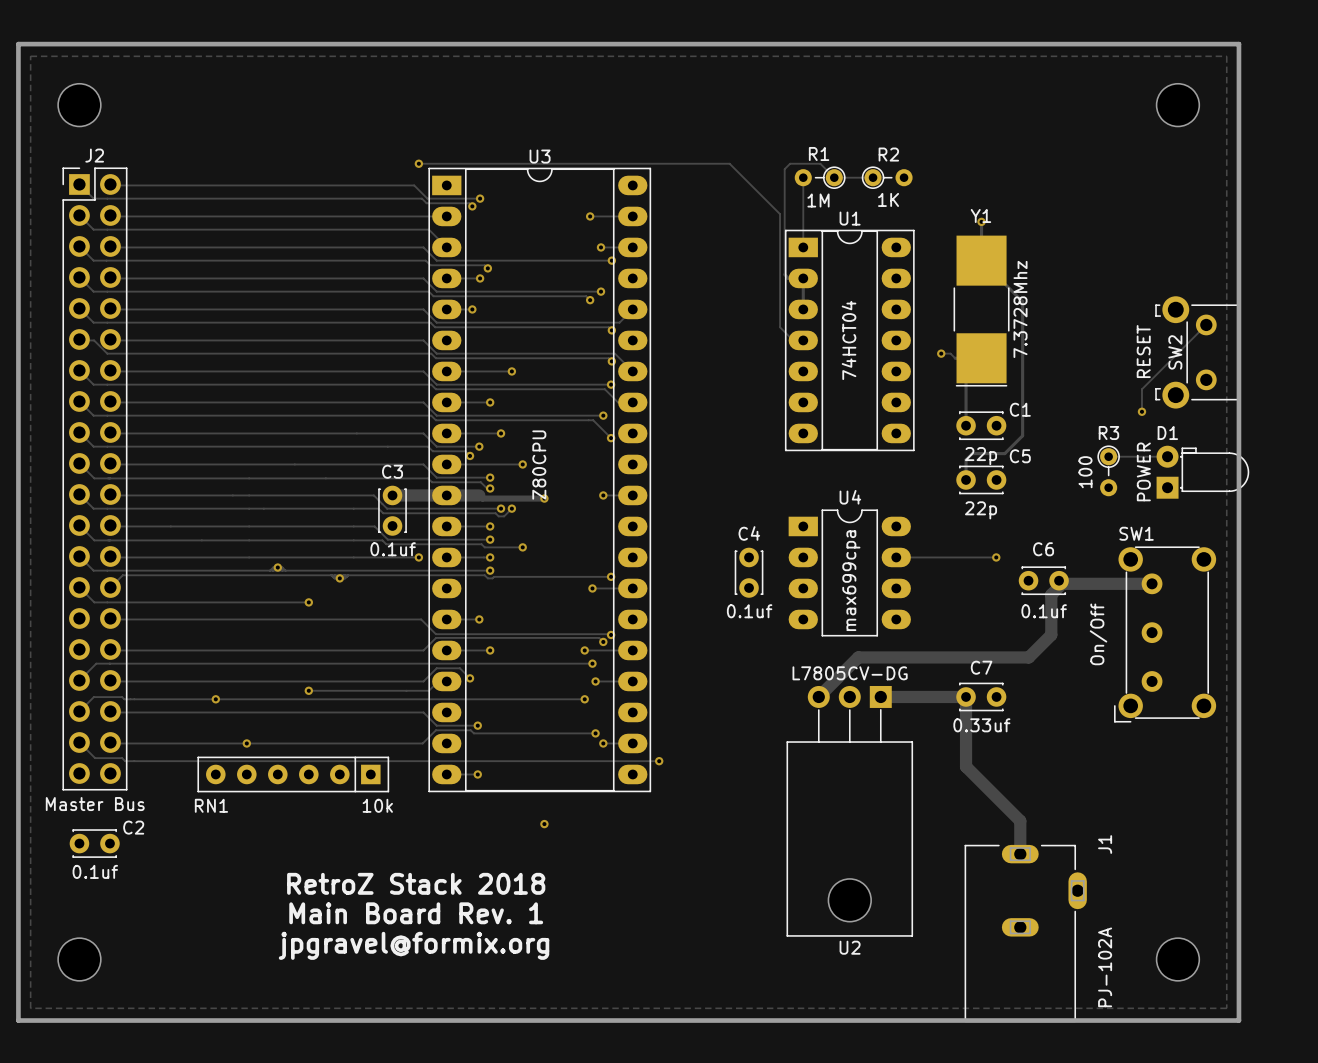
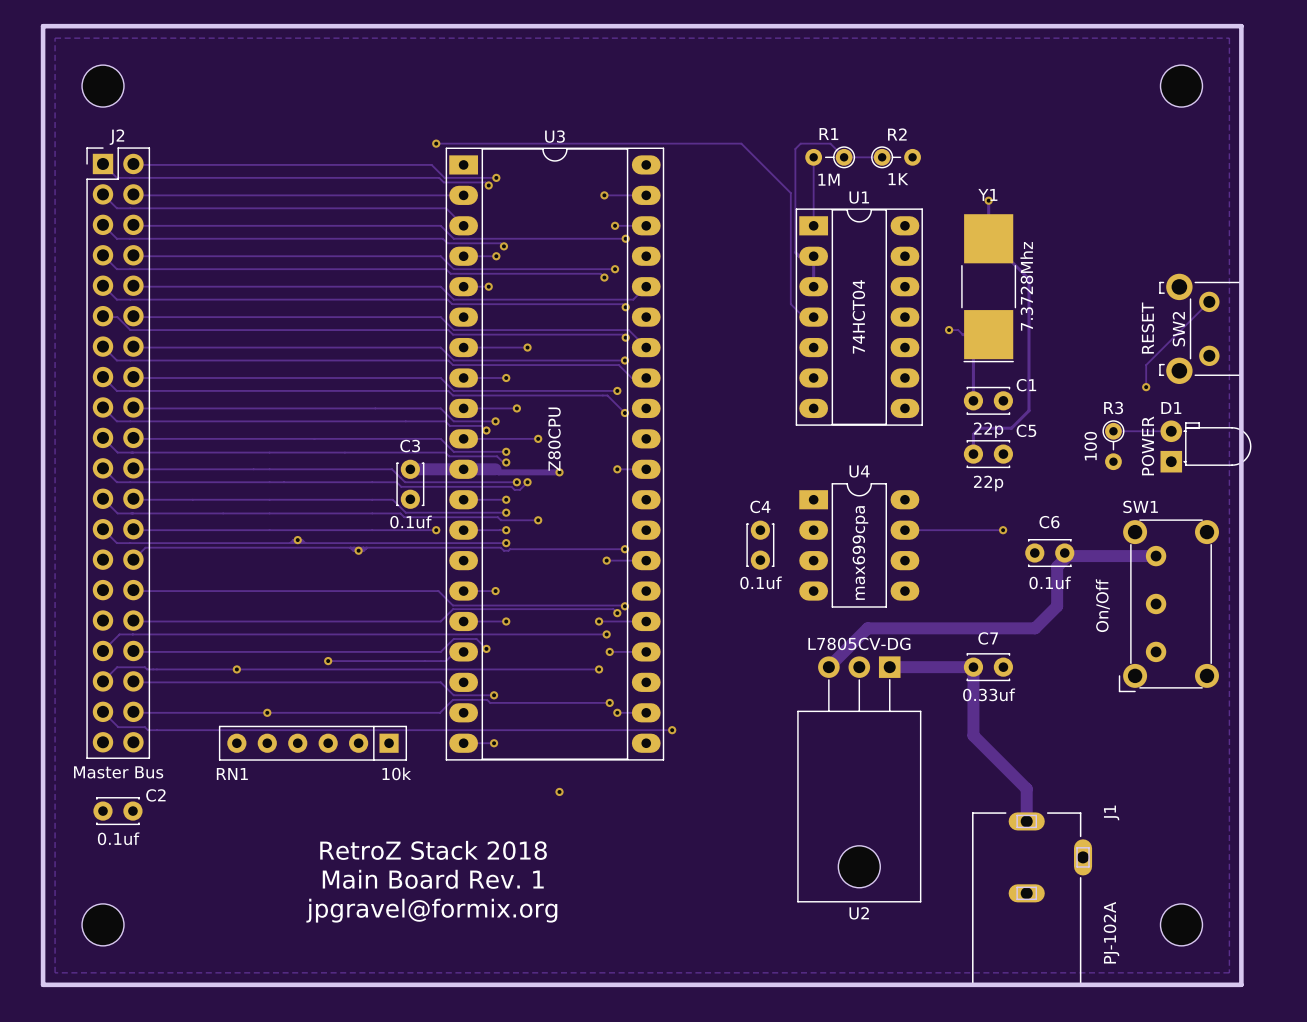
track: (79, 587) (94, 602) (308, 602) -> none
via: (308, 602) -> none

